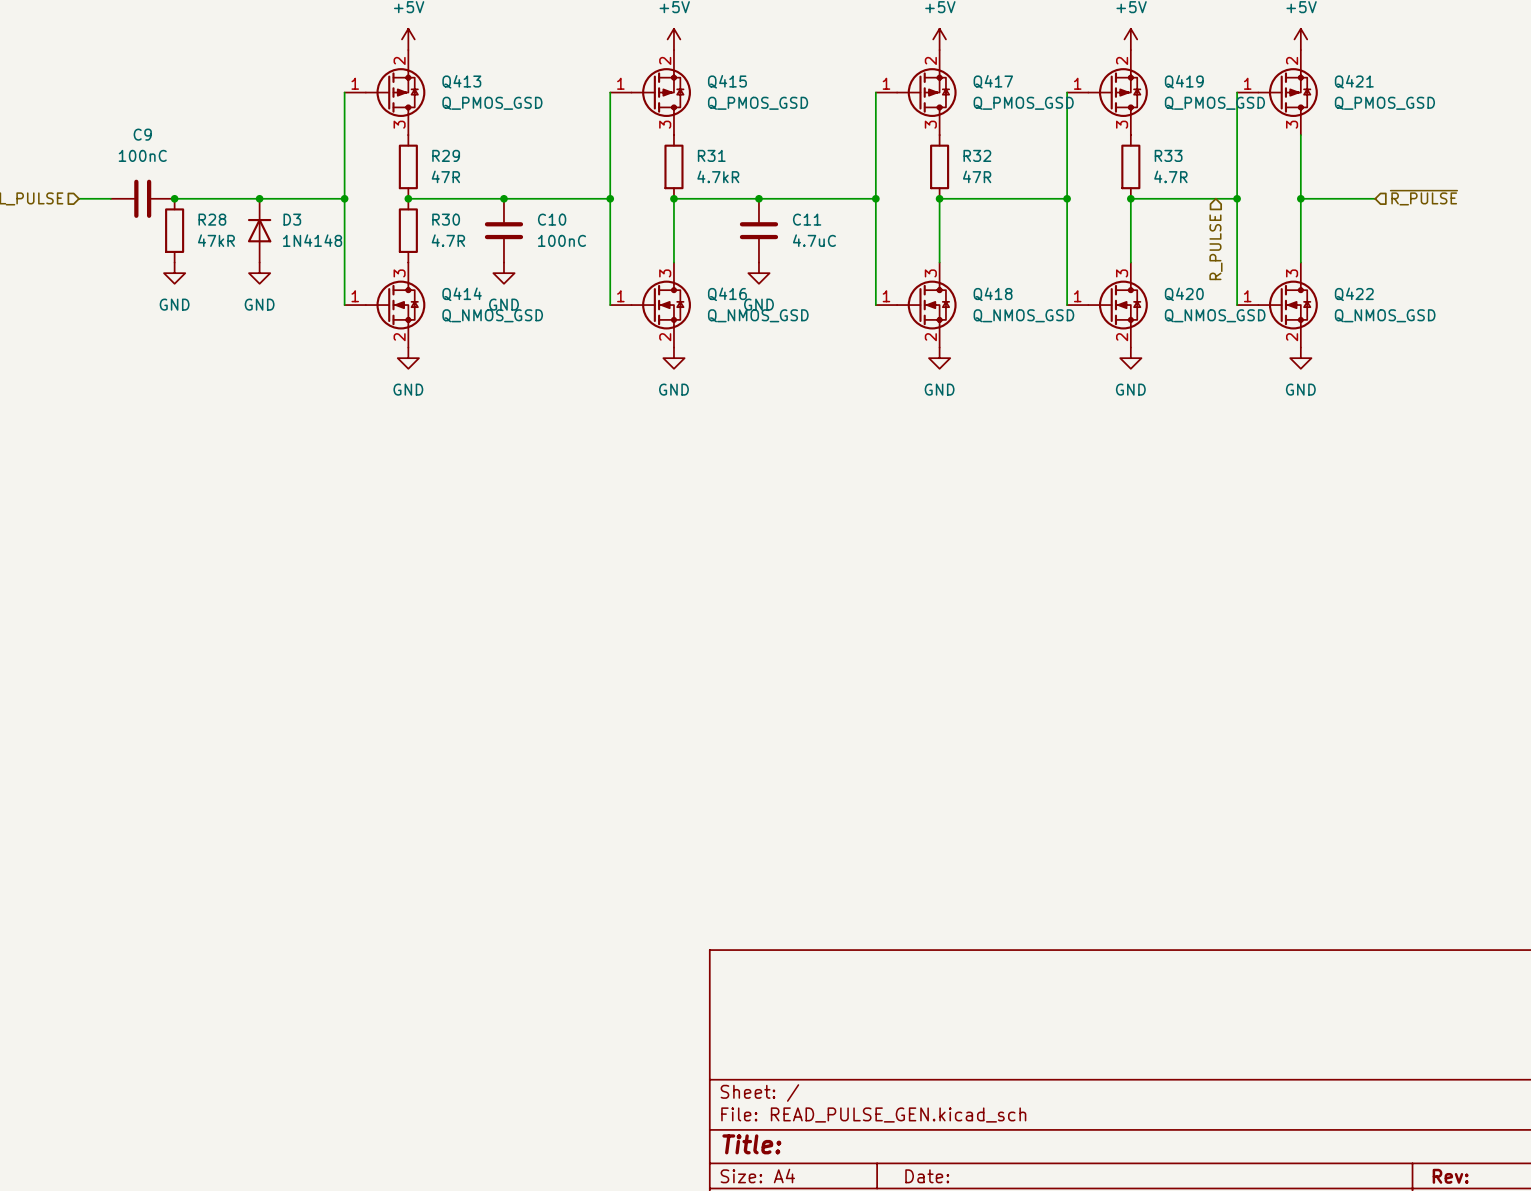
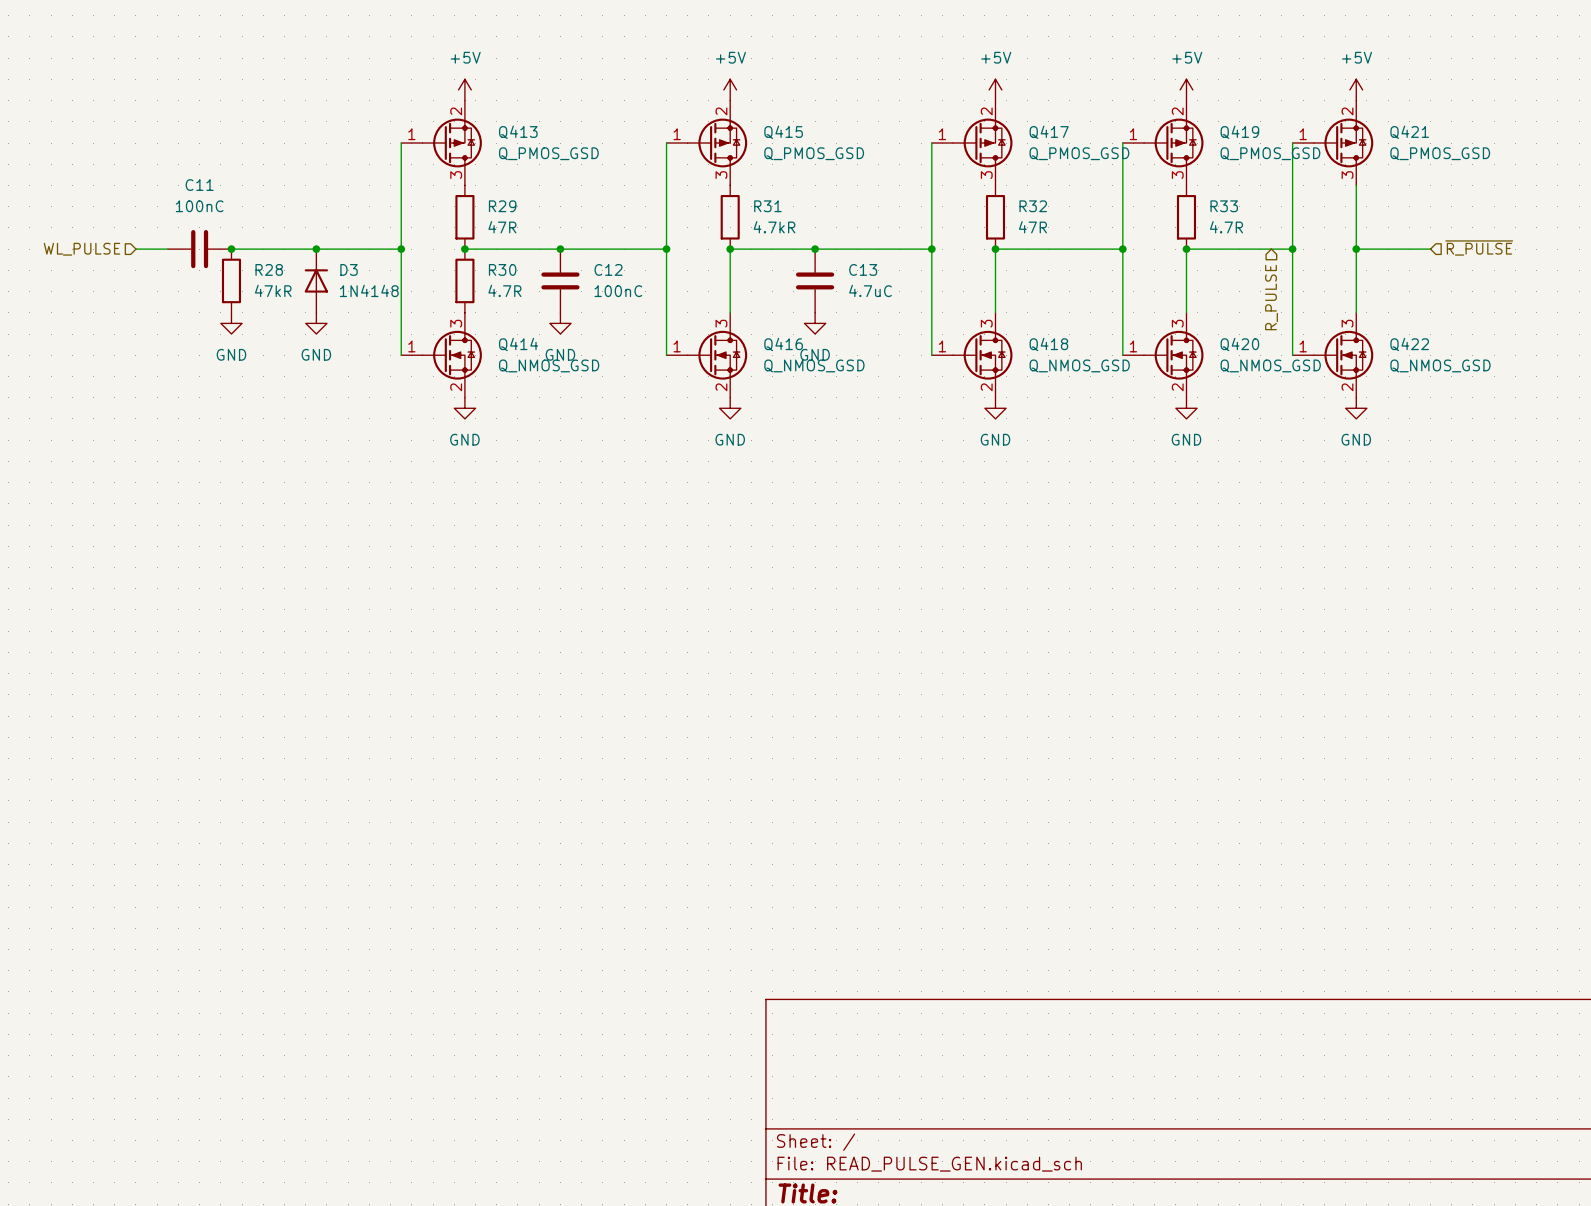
C9 name: C9 (142, 134) -> C11 (199, 185)
C10 name: C10 (552, 219) -> C12 (608, 269)
C11 name: C11 (807, 219) -> C13 (863, 269)

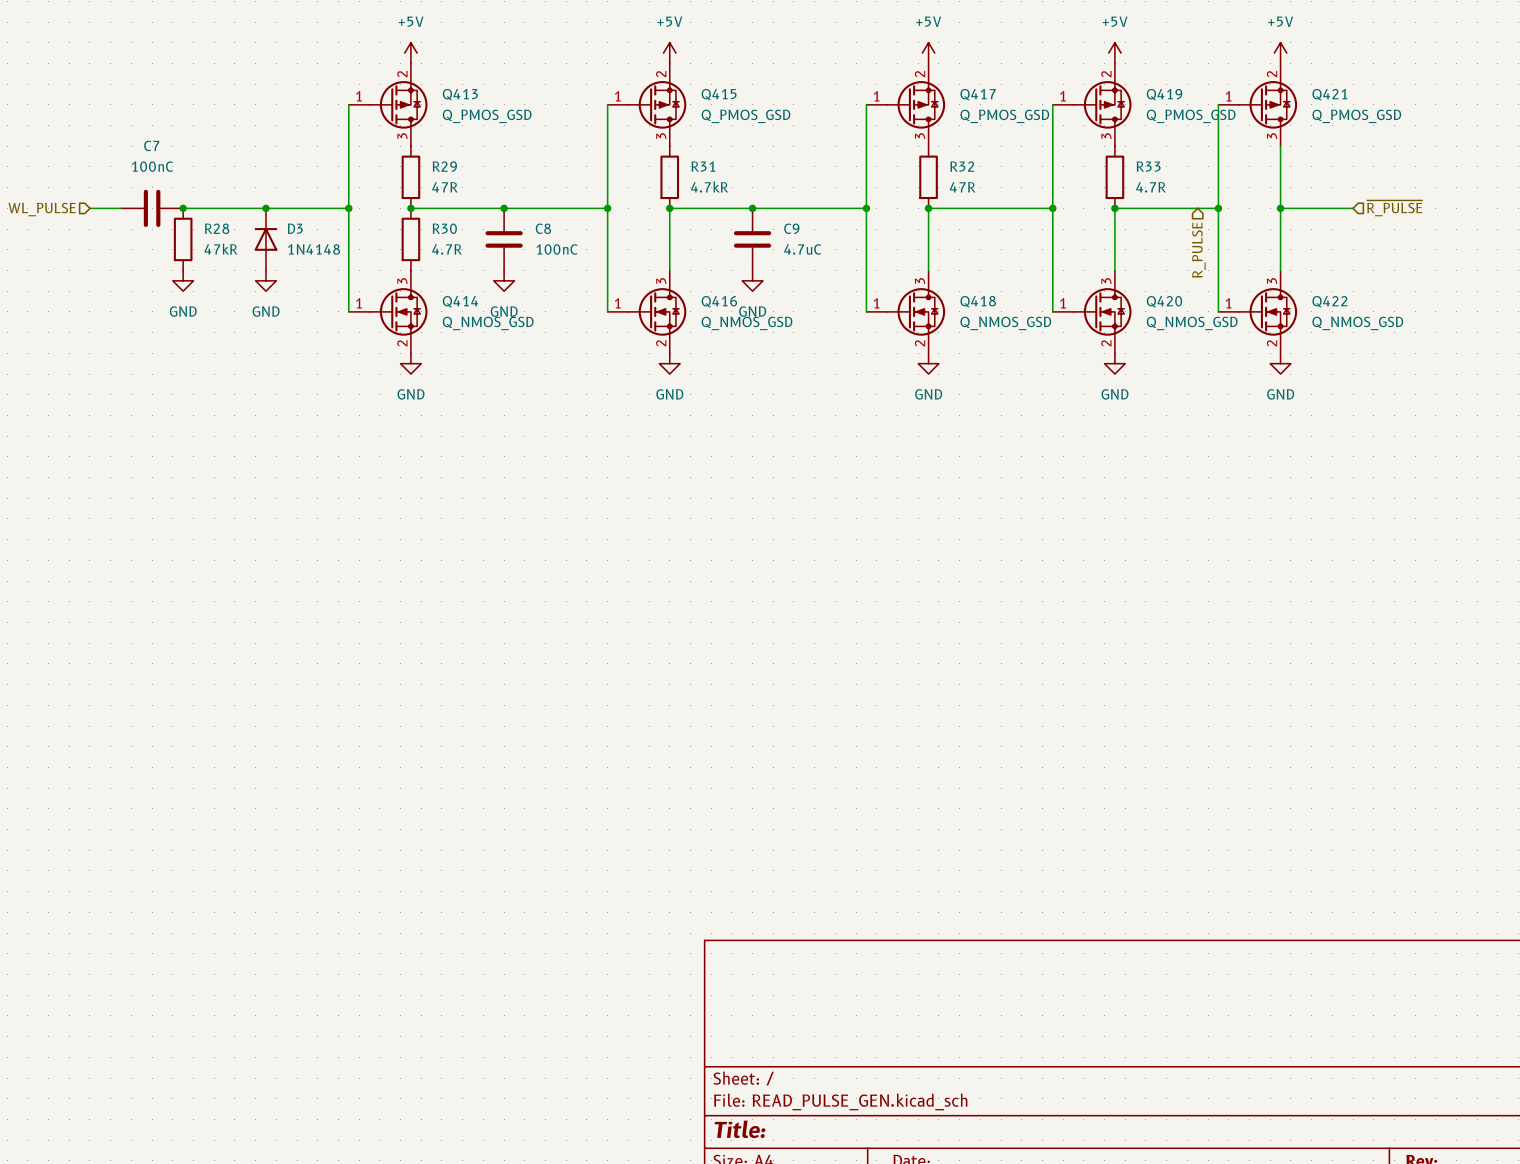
C11 name: C11 (199, 185) -> C7 (151, 145)
C12 name: C12 (608, 269) -> C8 (543, 228)
C13 name: C13 (863, 269) -> C9 (791, 228)

